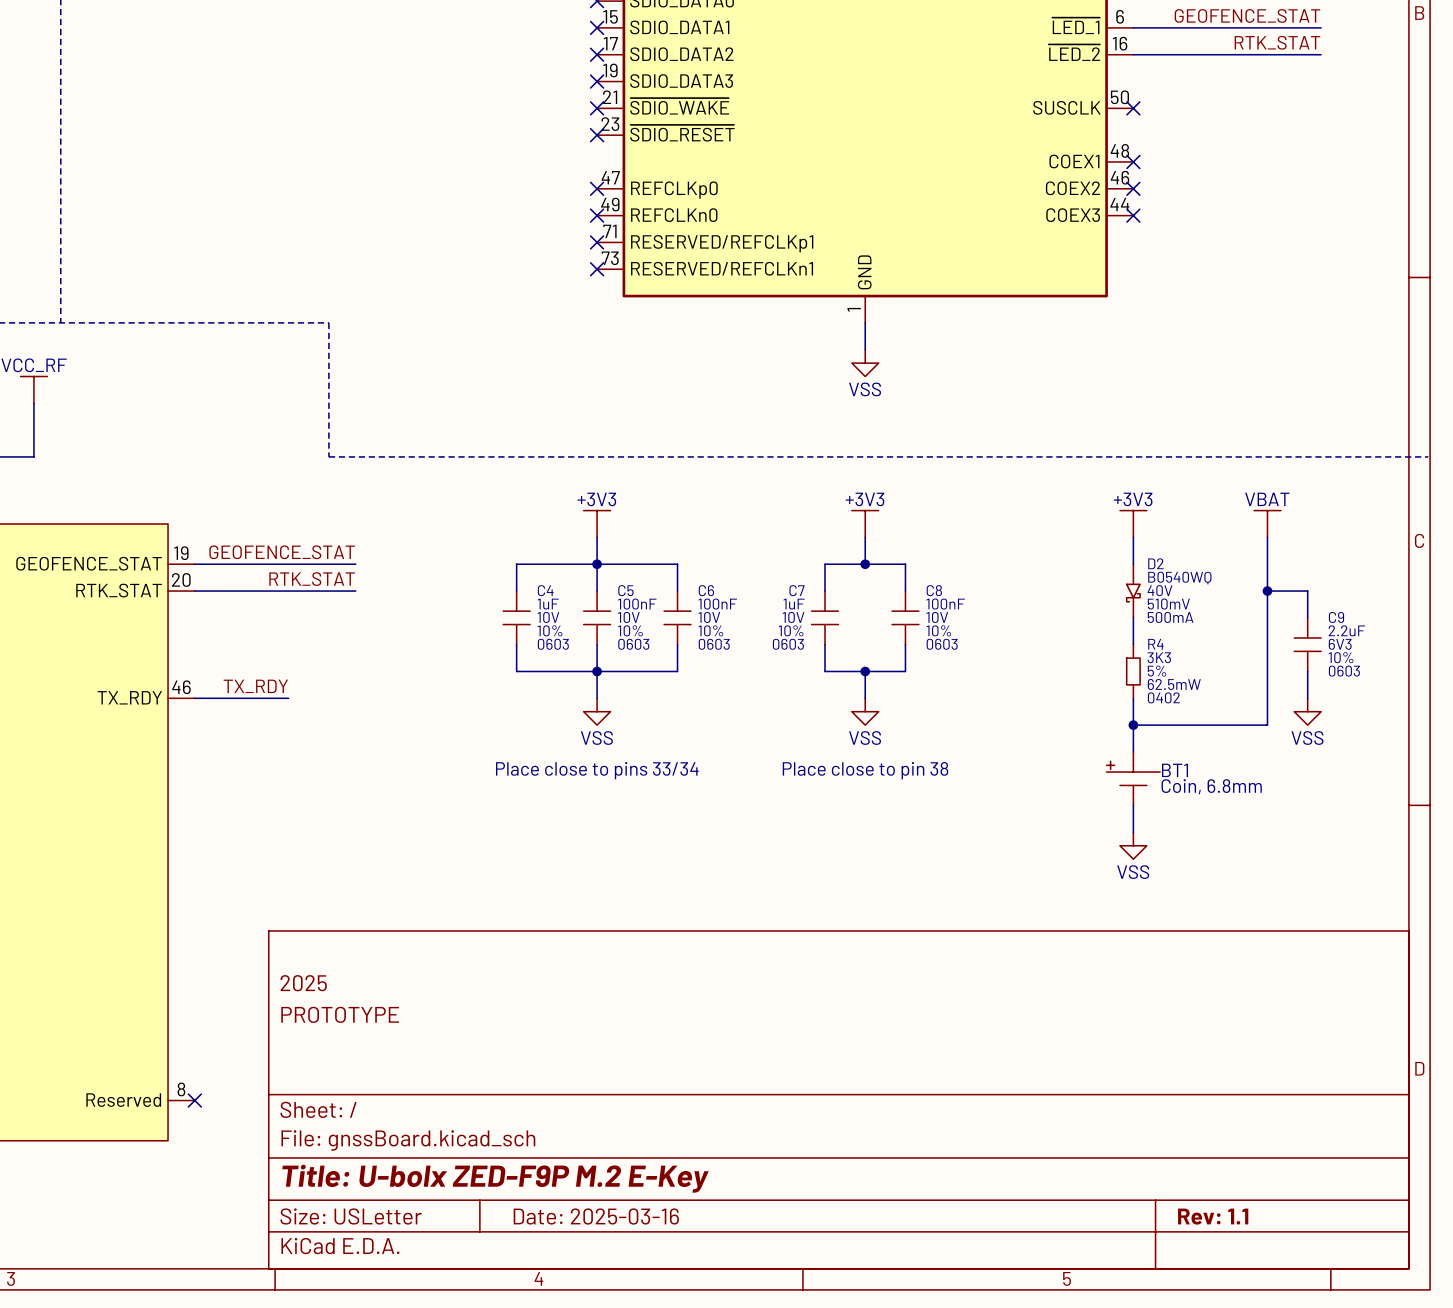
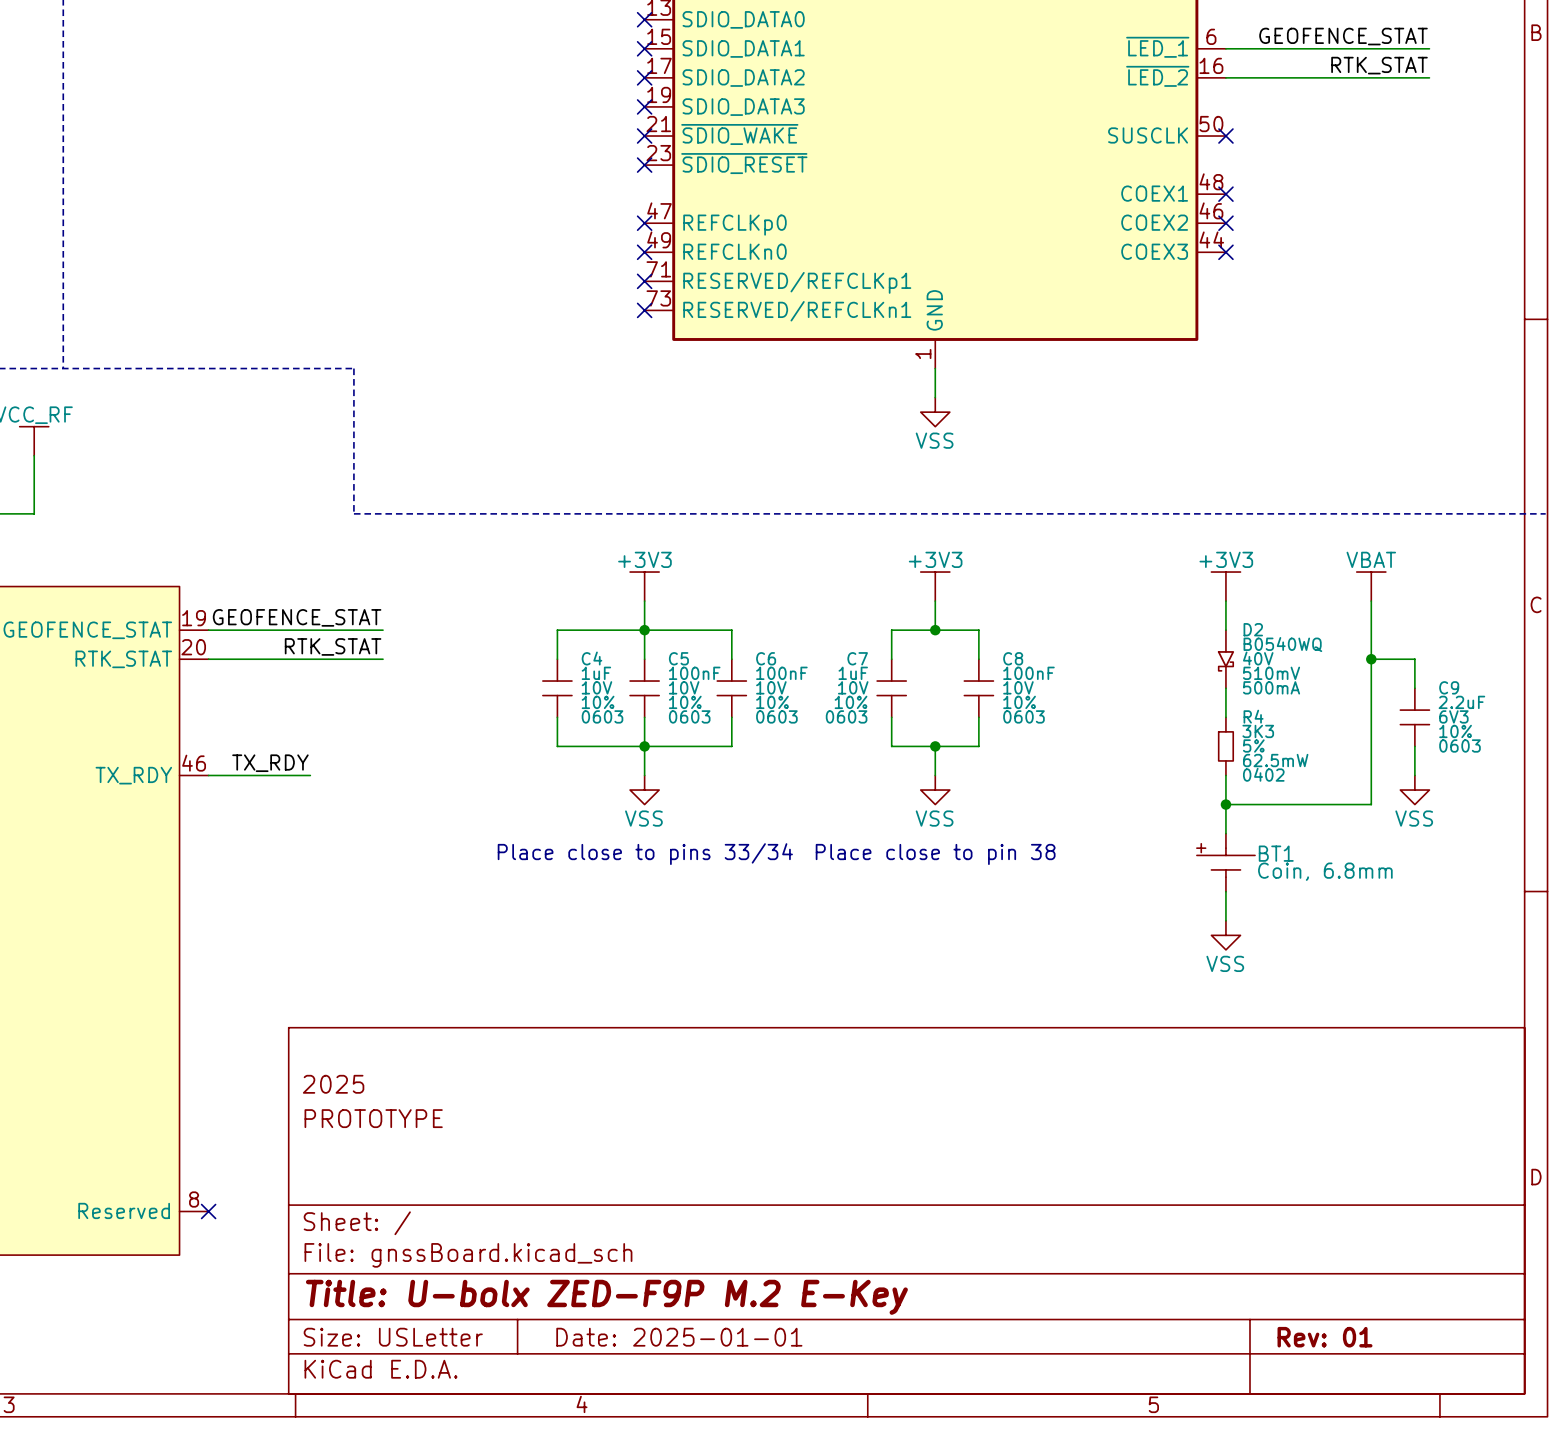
title block: Date: 2025-03-16 (596, 1216) -> Date: 2025-01-01 (679, 1337)
title block: Rev: 1.1 (1213, 1216) -> Rev: 01 (1325, 1337)

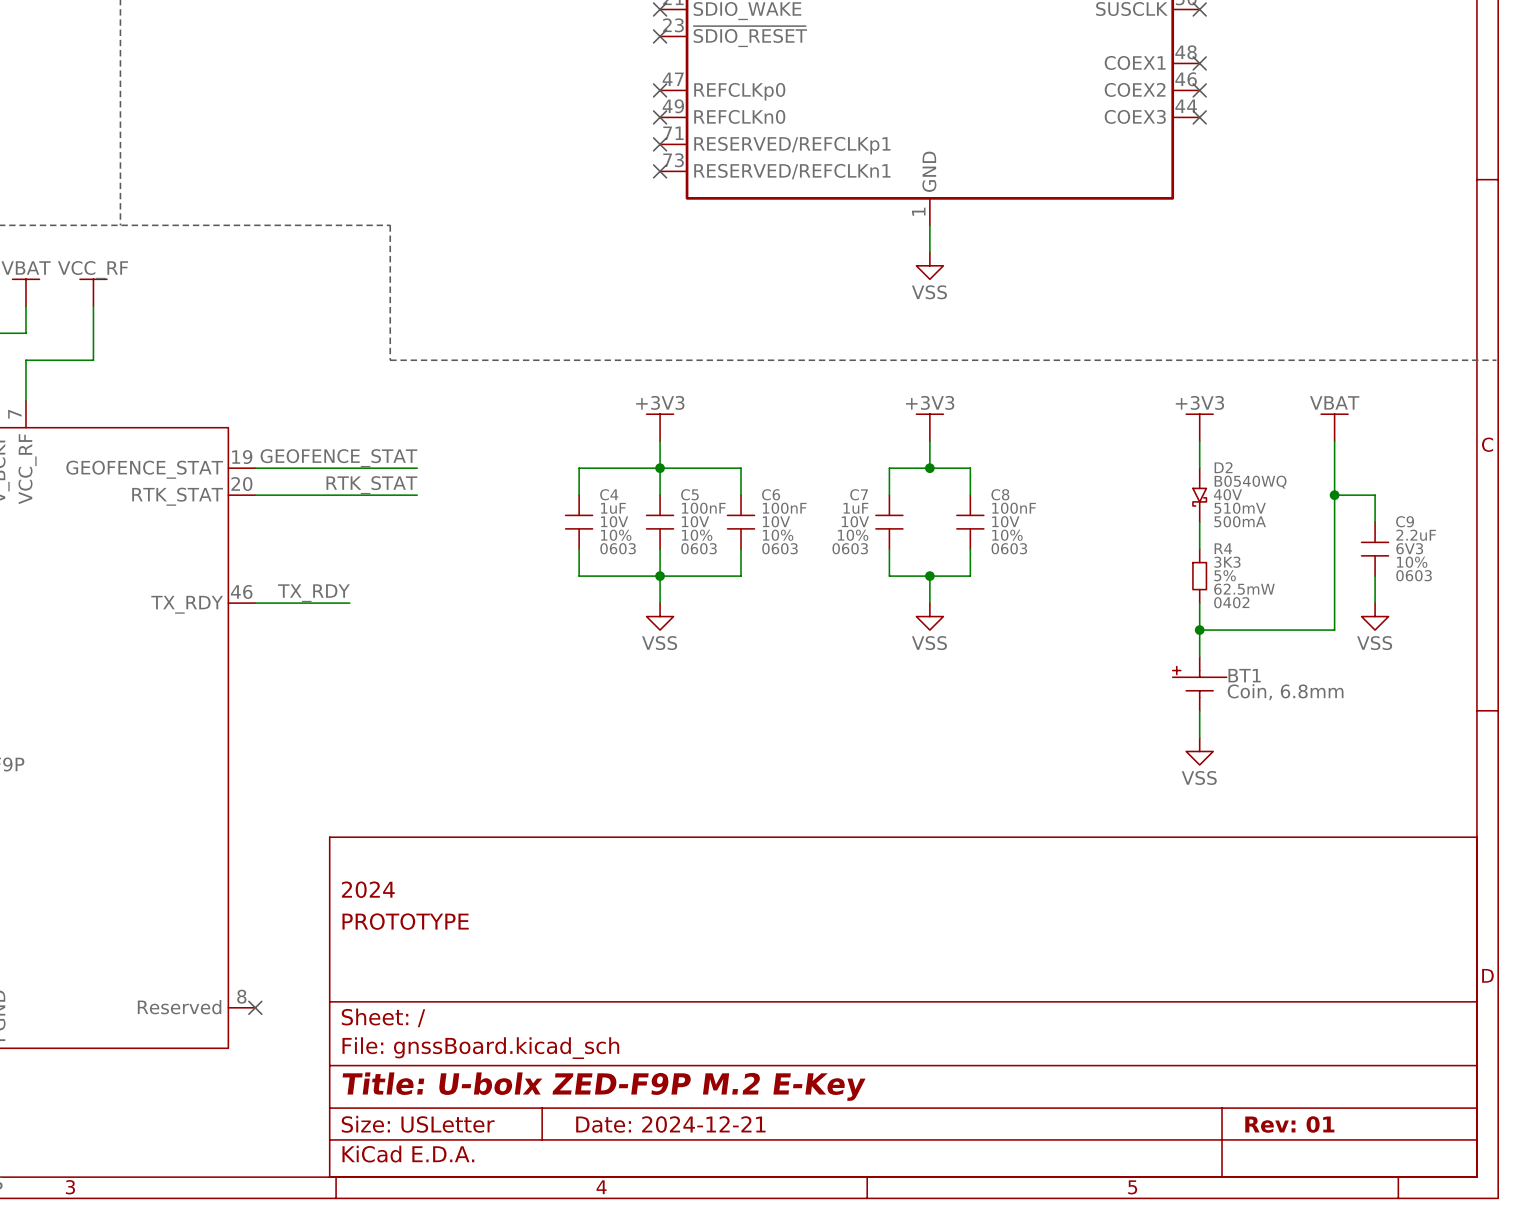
text: Place close to pins 33/34 (645, 854) -> none
text: Place close to pin 38 (935, 854) -> none
title block: 2025 (333, 1084) -> 2024 (368, 889)
title block: Date: 2025-01-01 (679, 1337) -> Date: 2024-12-21 (670, 1124)

